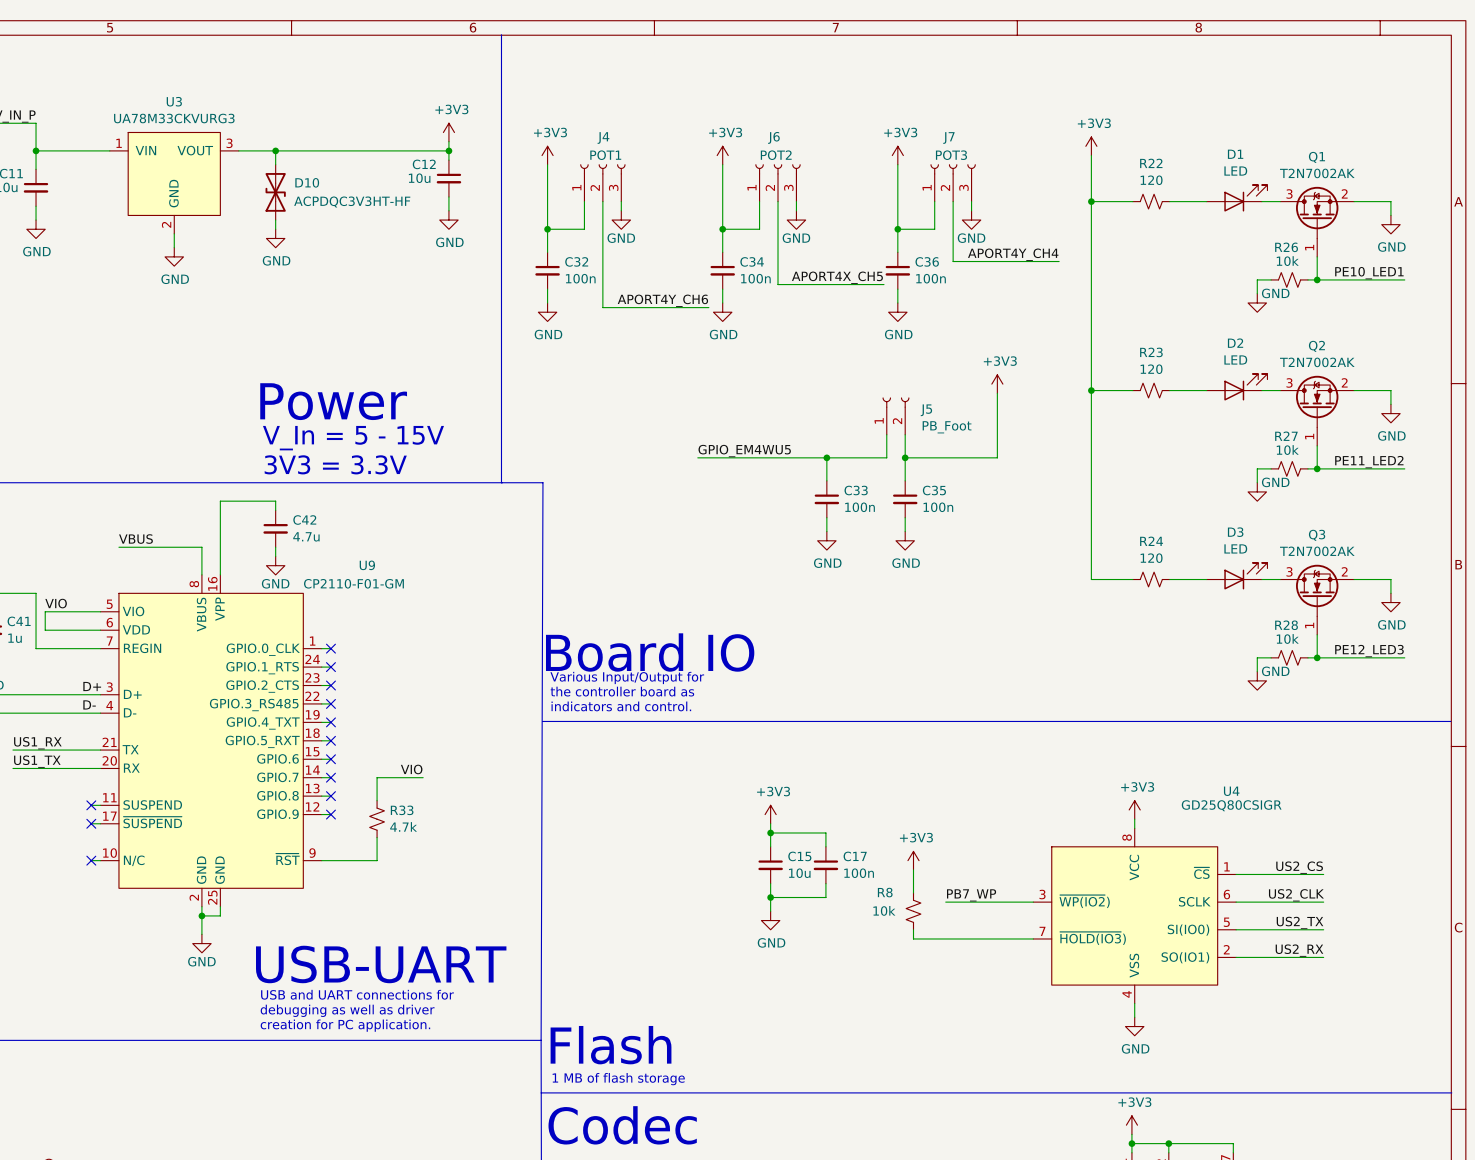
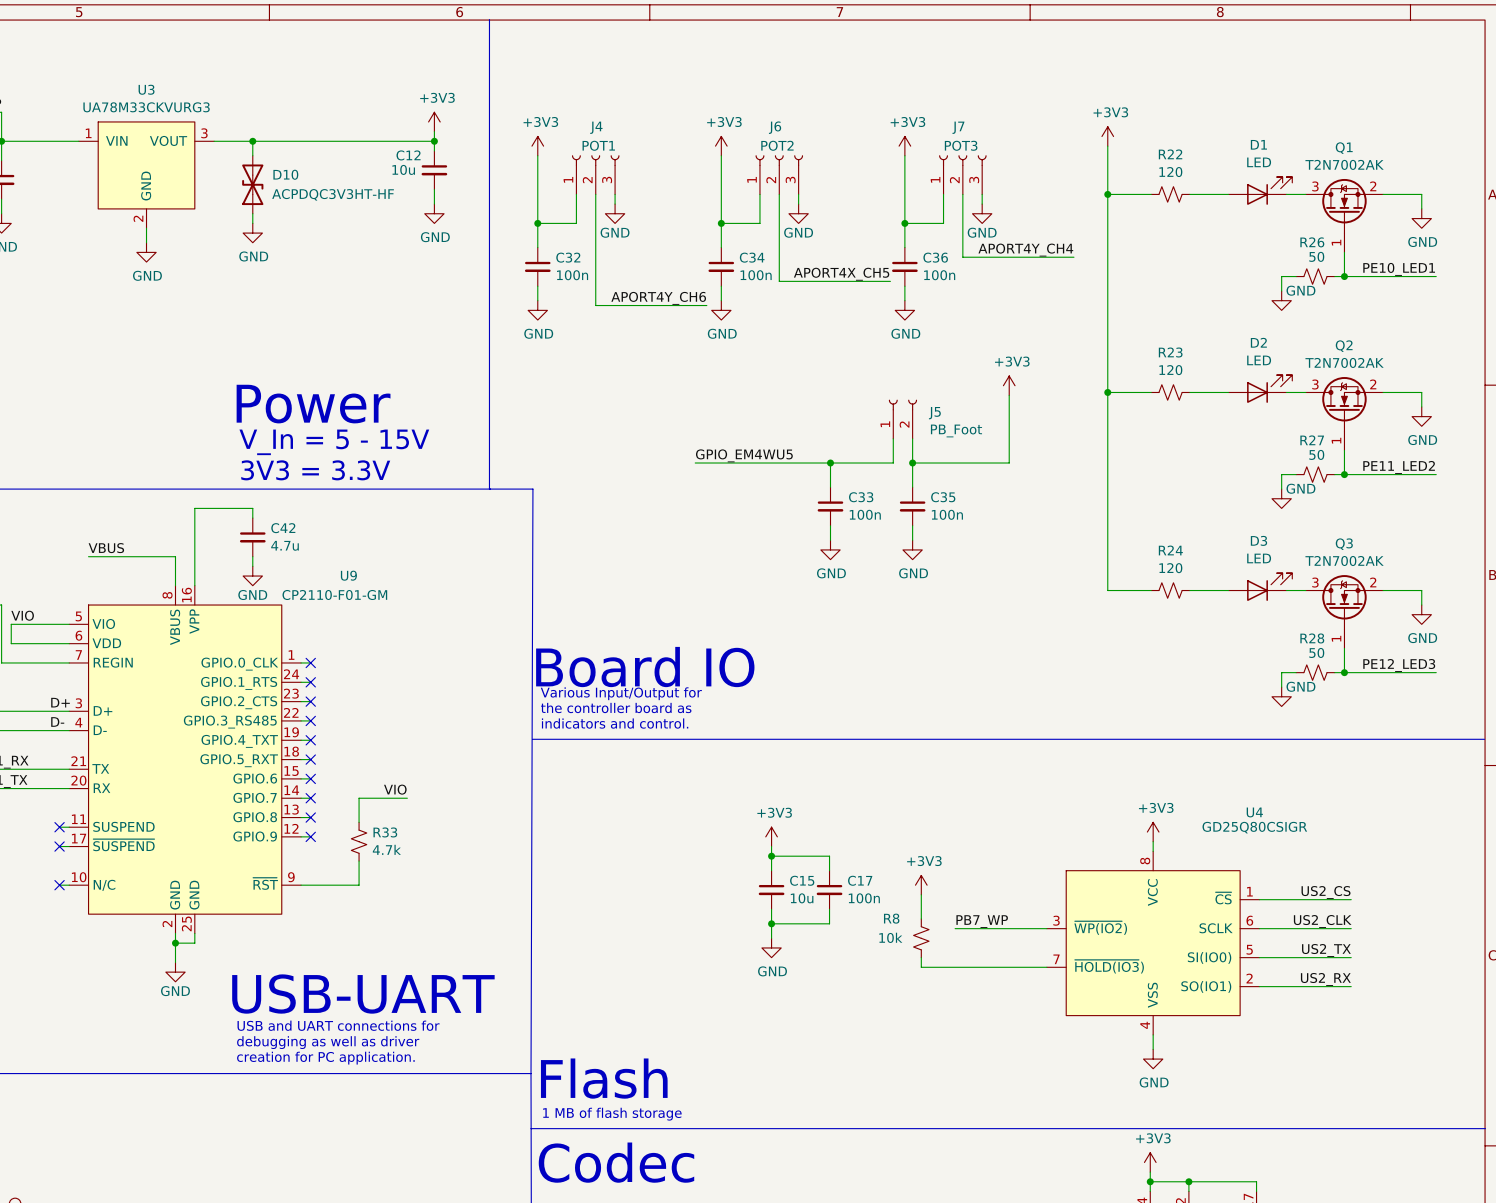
R26 value: 10k (1287, 261) -> 50 (1316, 256)
R27 value: 10k (1287, 450) -> 50 (1316, 454)
R28 value: 10k (1287, 638) -> 50 (1316, 652)

